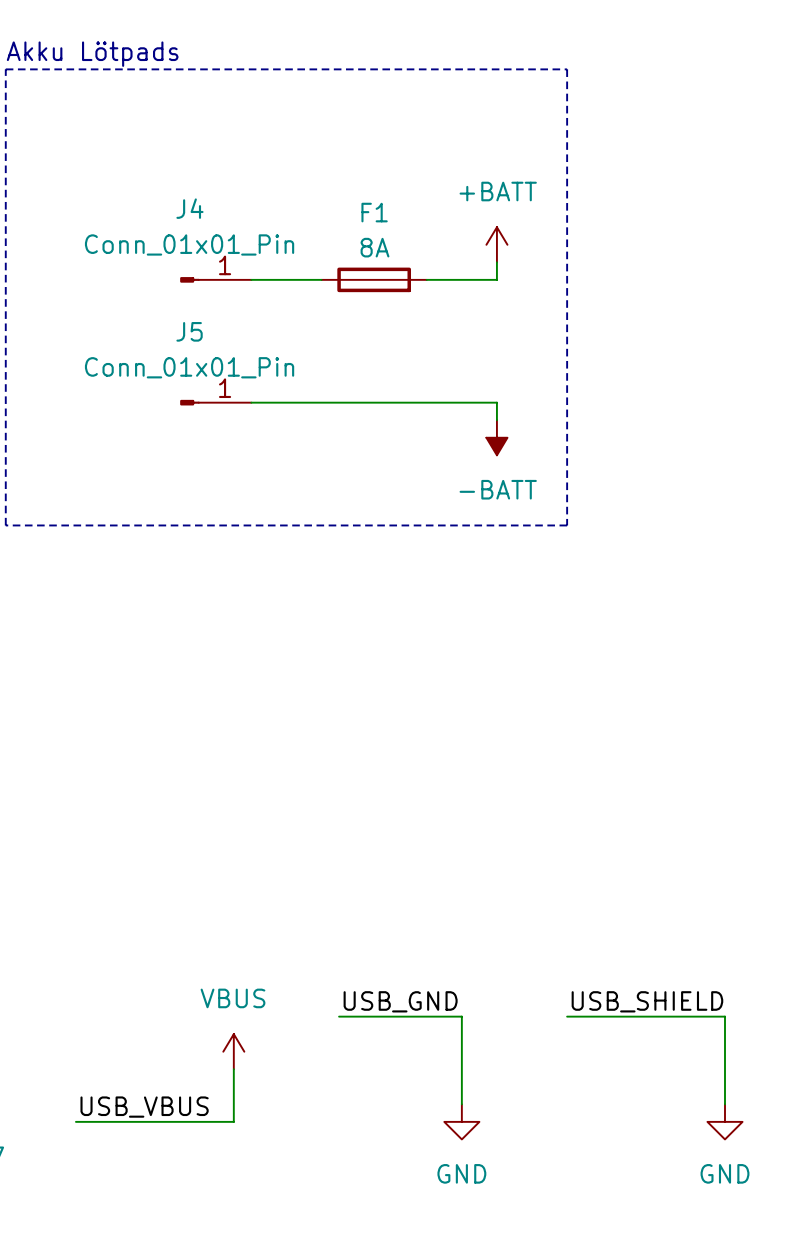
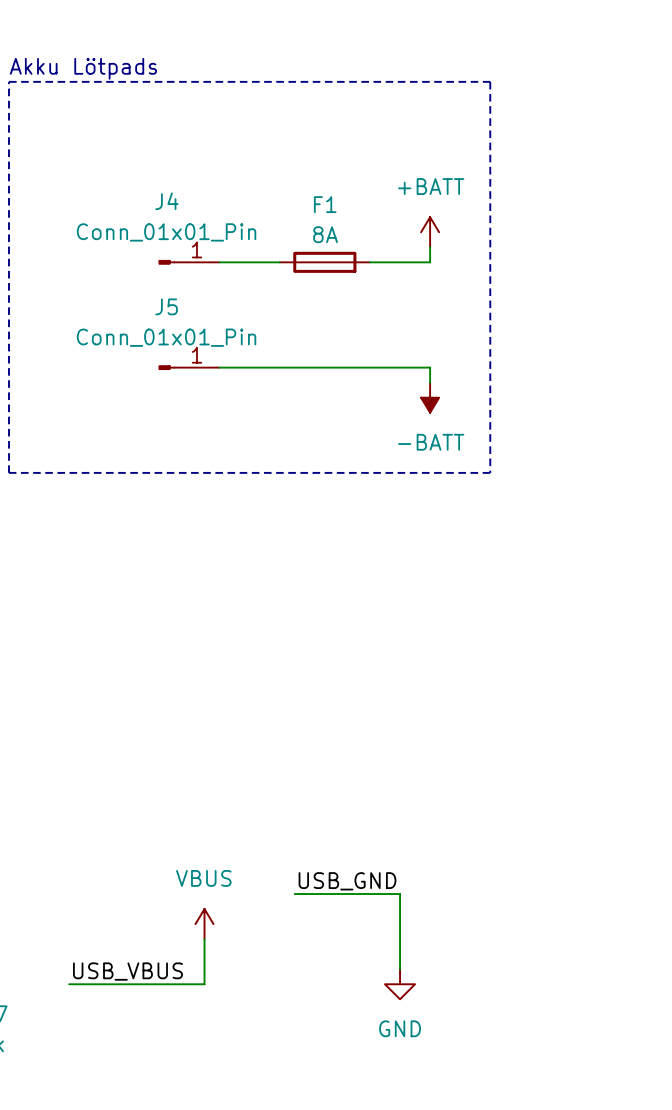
label: USB_SHIELD (647, 1001) -> none
wire: (567, 1016) (725, 1016) (725, 1104) -> none
power symbol: GND (725, 1121) -> none

